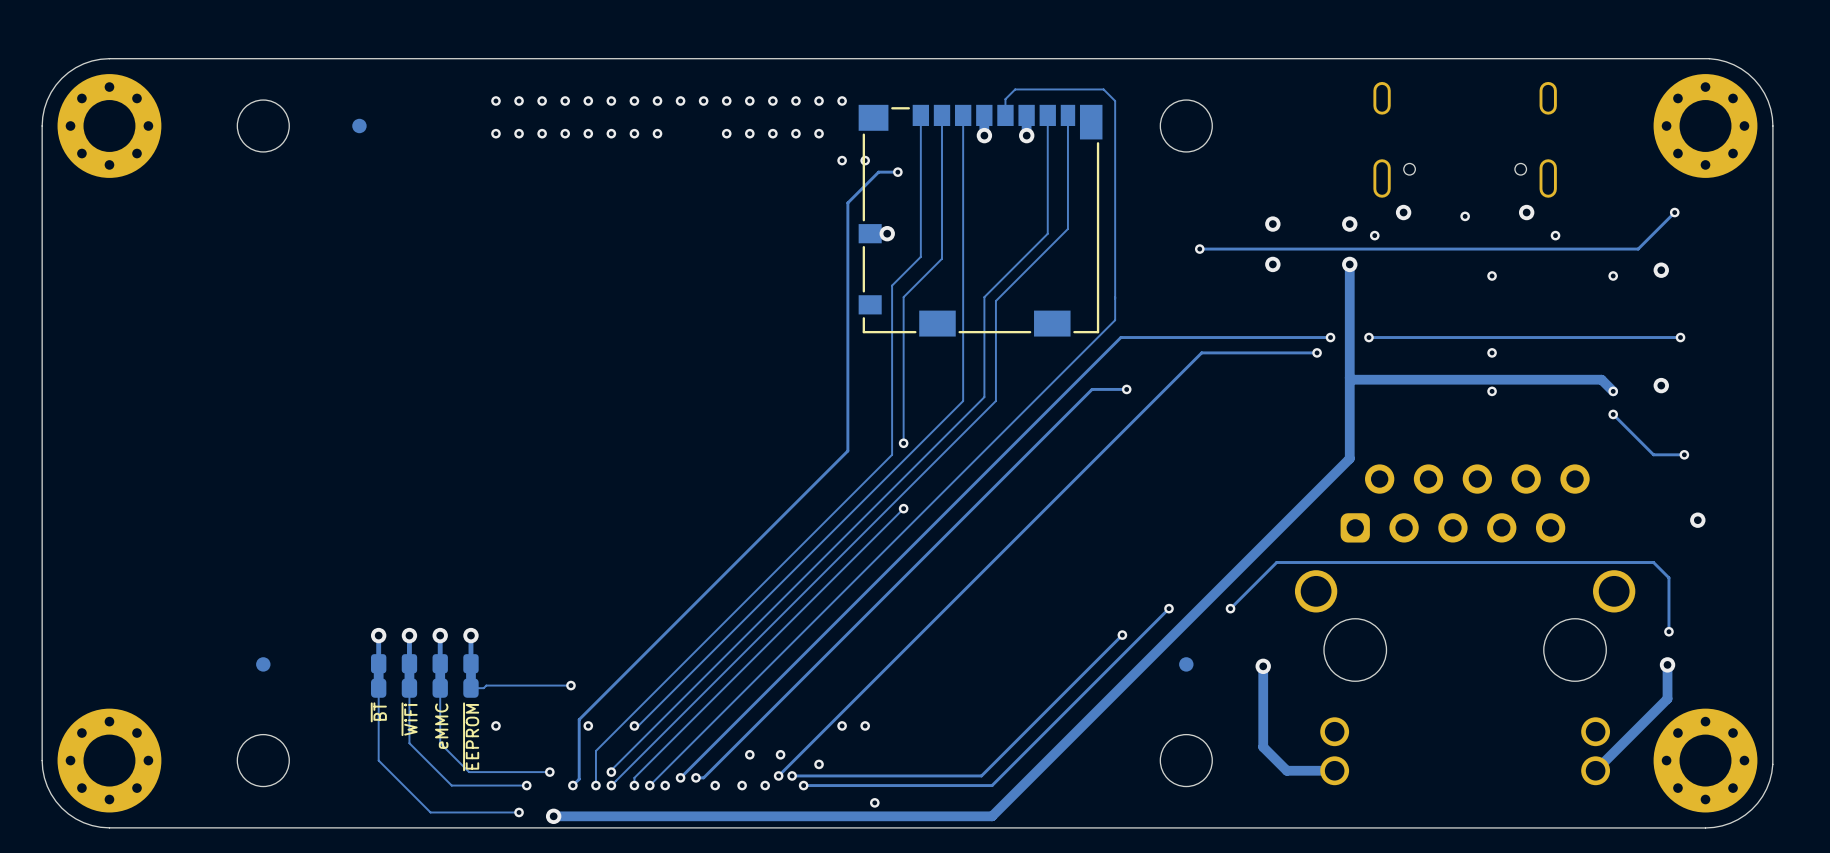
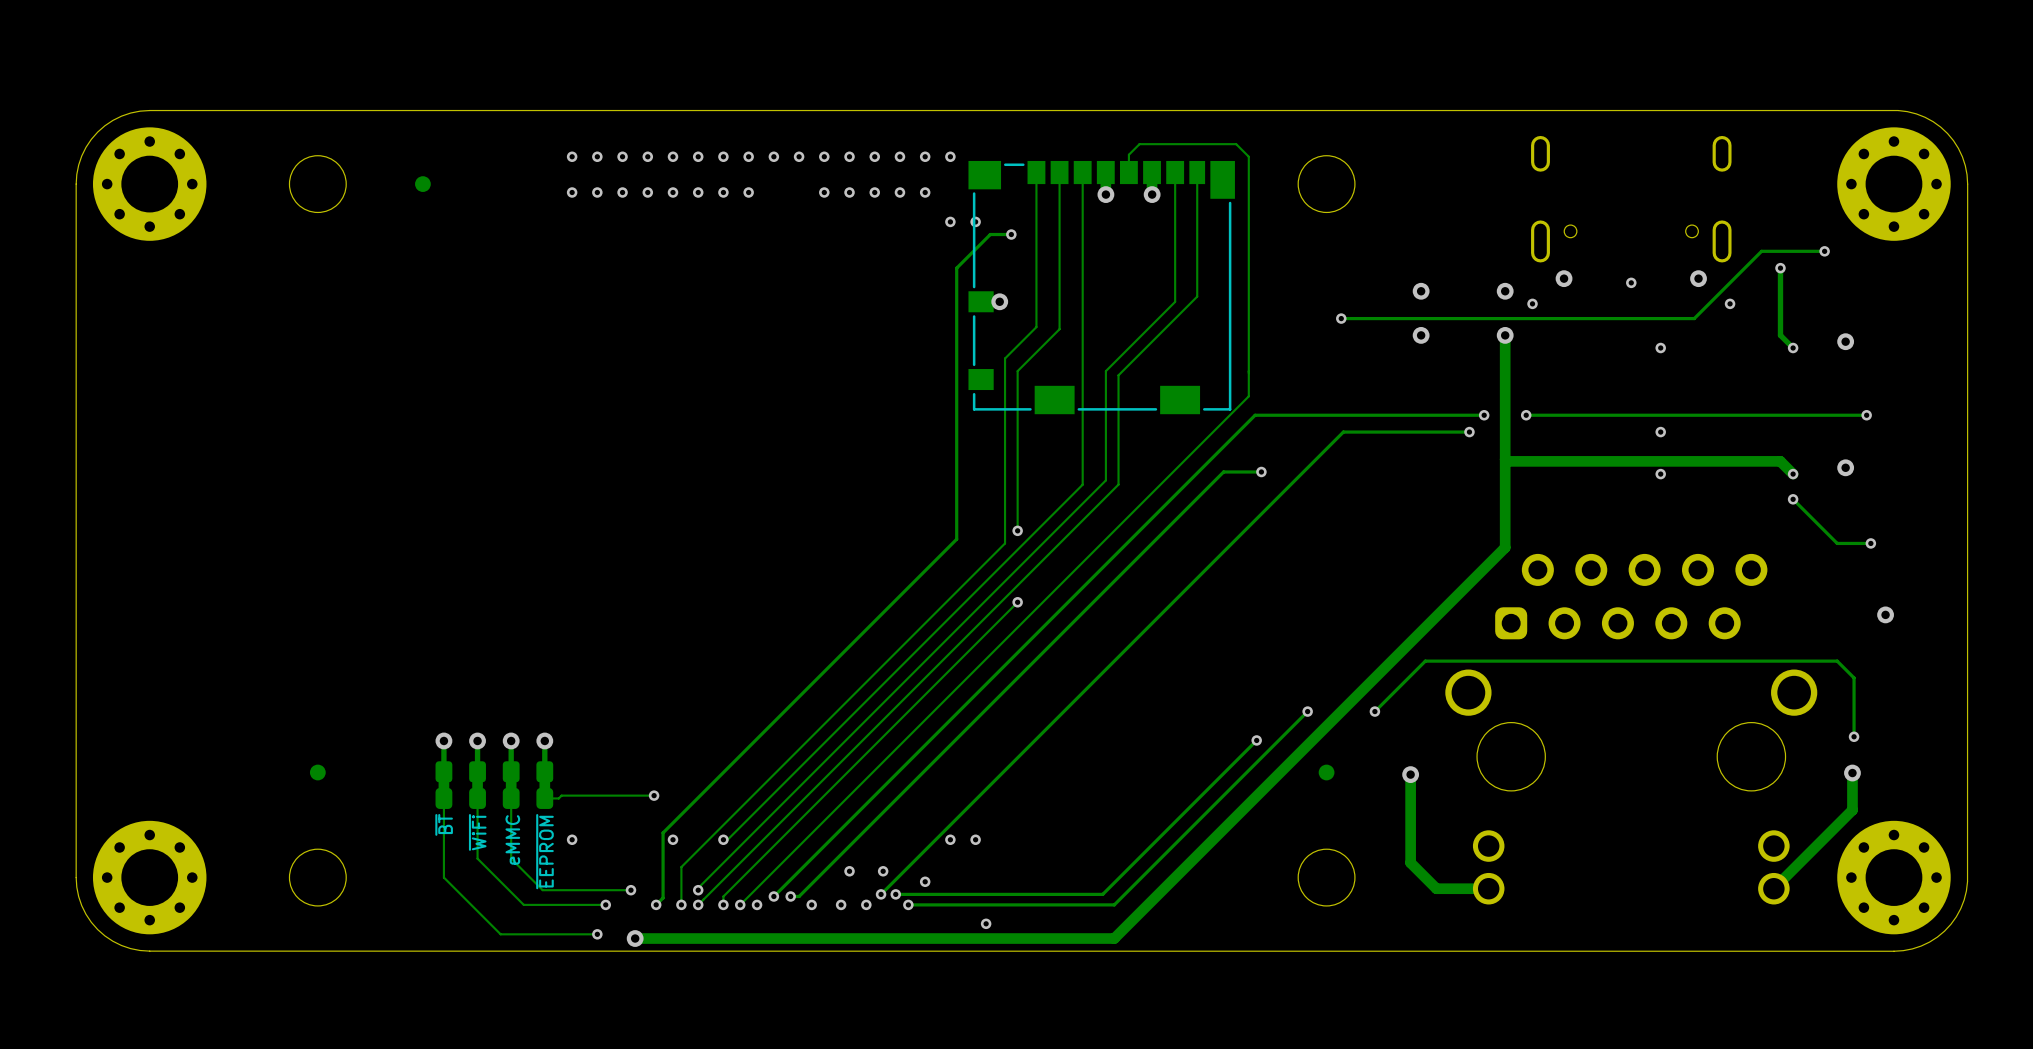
via: none -> (1824, 251)
track: none -> (1780, 268) (1780, 335) (1793, 348)
via: none -> (1780, 268)
track: (1674, 212) (1638, 249) (1522, 249) -> (1824, 251) (1761, 251) (1694, 318)
via: (1674, 212) -> none

